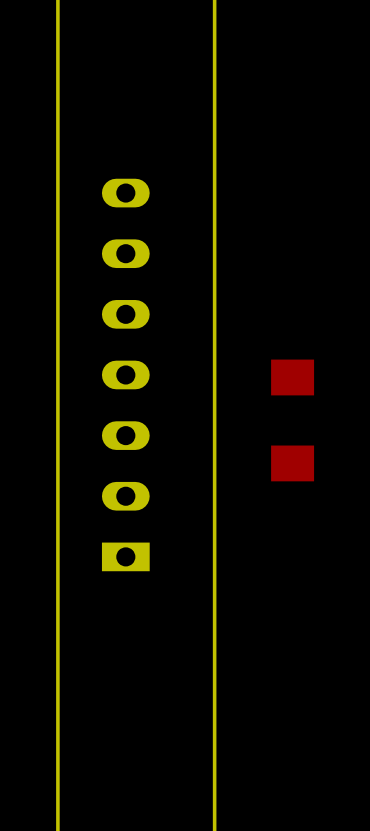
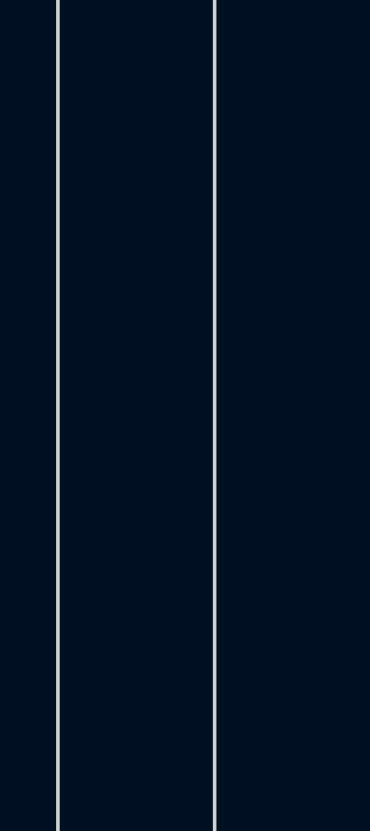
part: (125, 374) -> none
part: (292, 420) -> none

